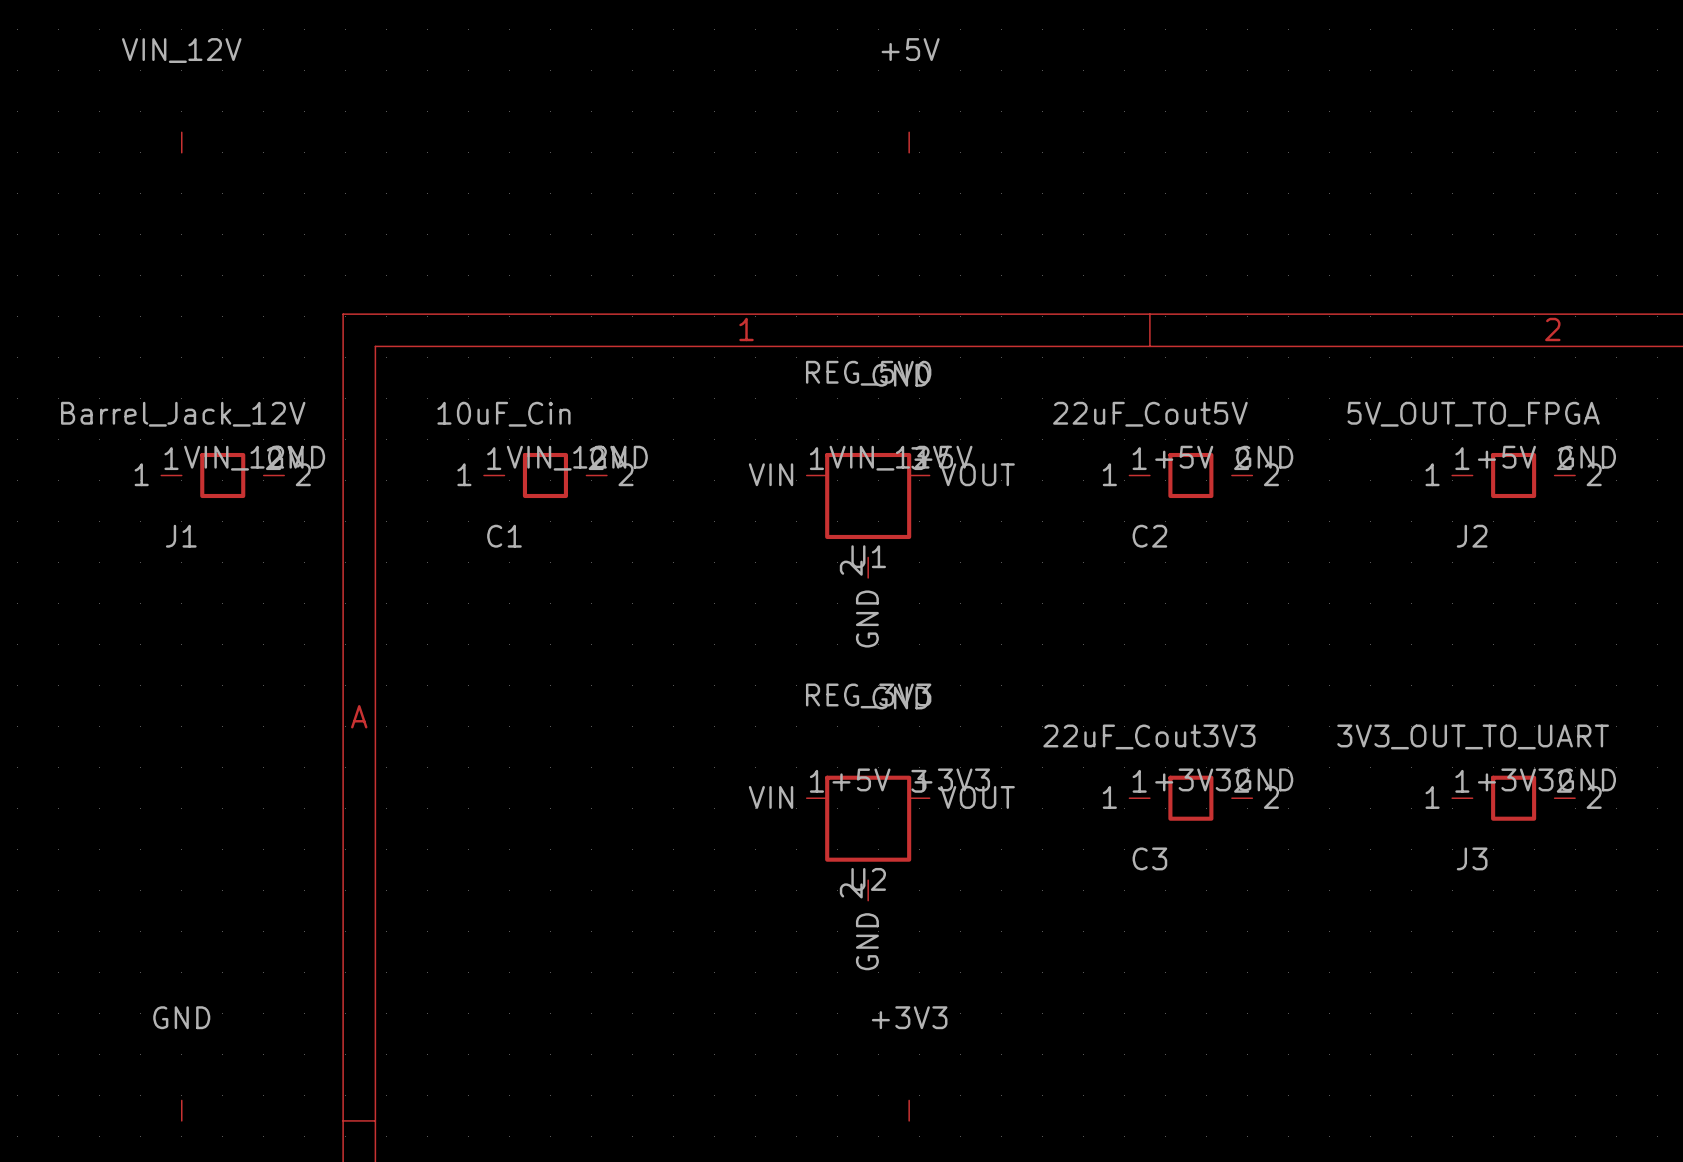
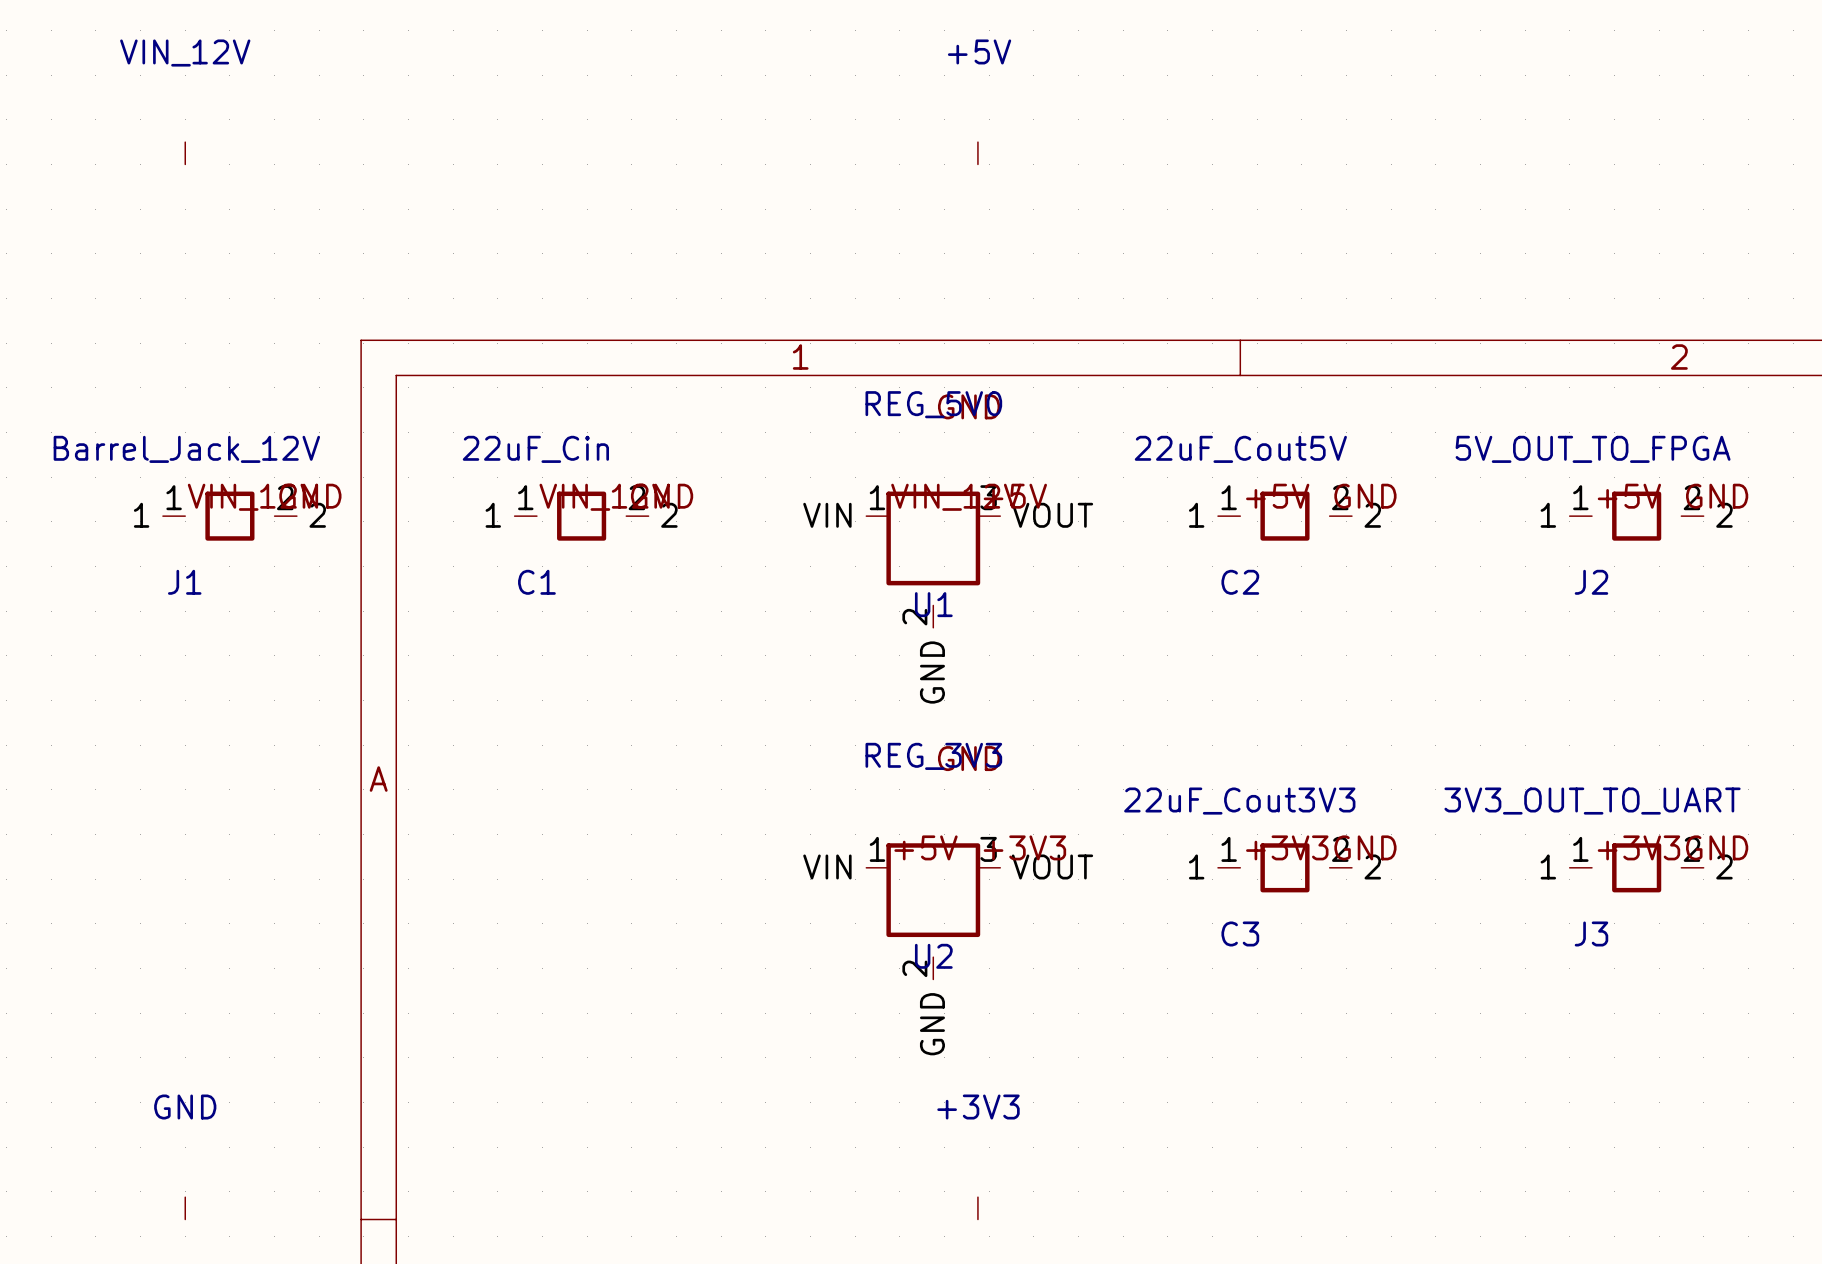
C1 value: 10uF_Cin (503, 414) -> 22uF_Cin (535, 449)

